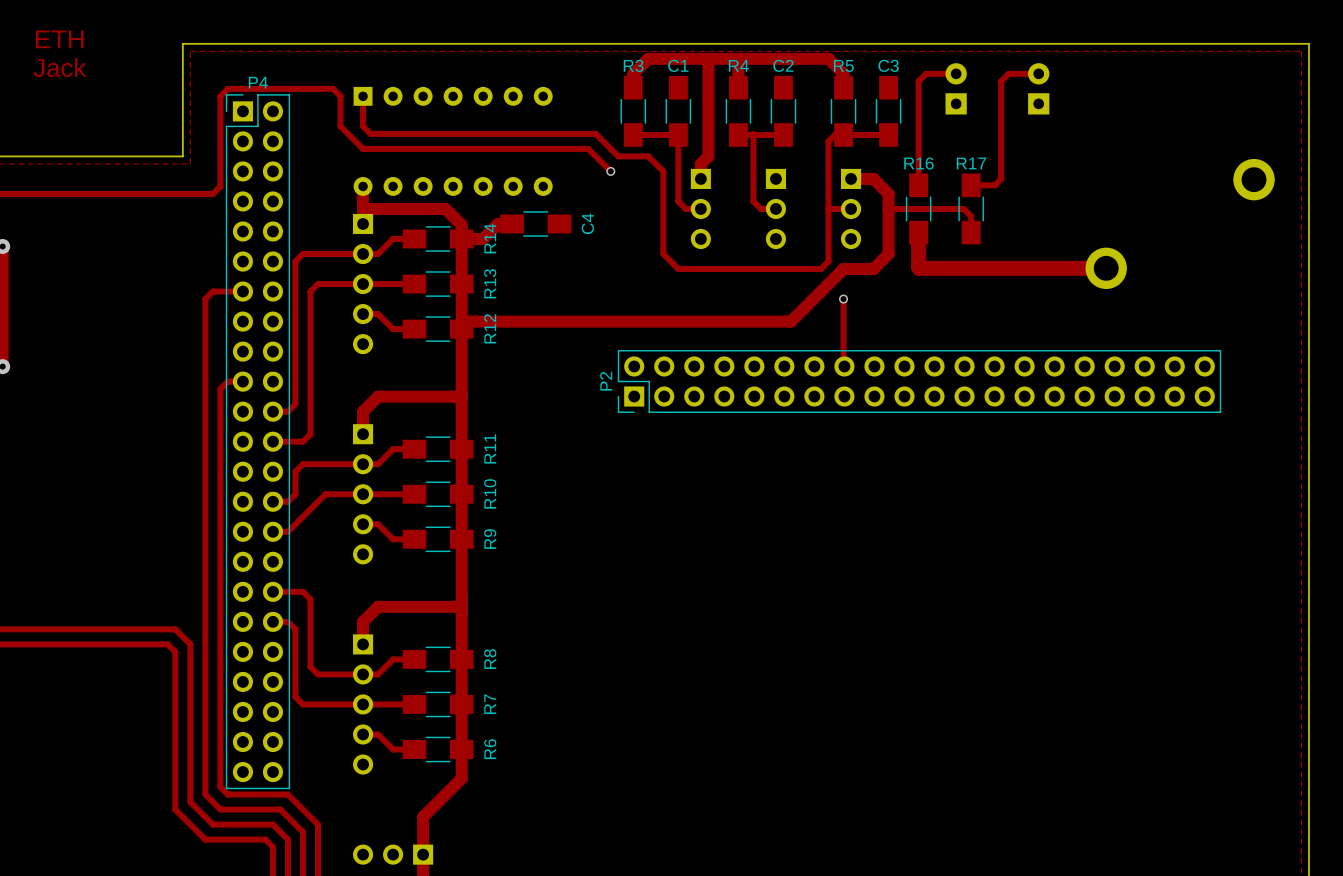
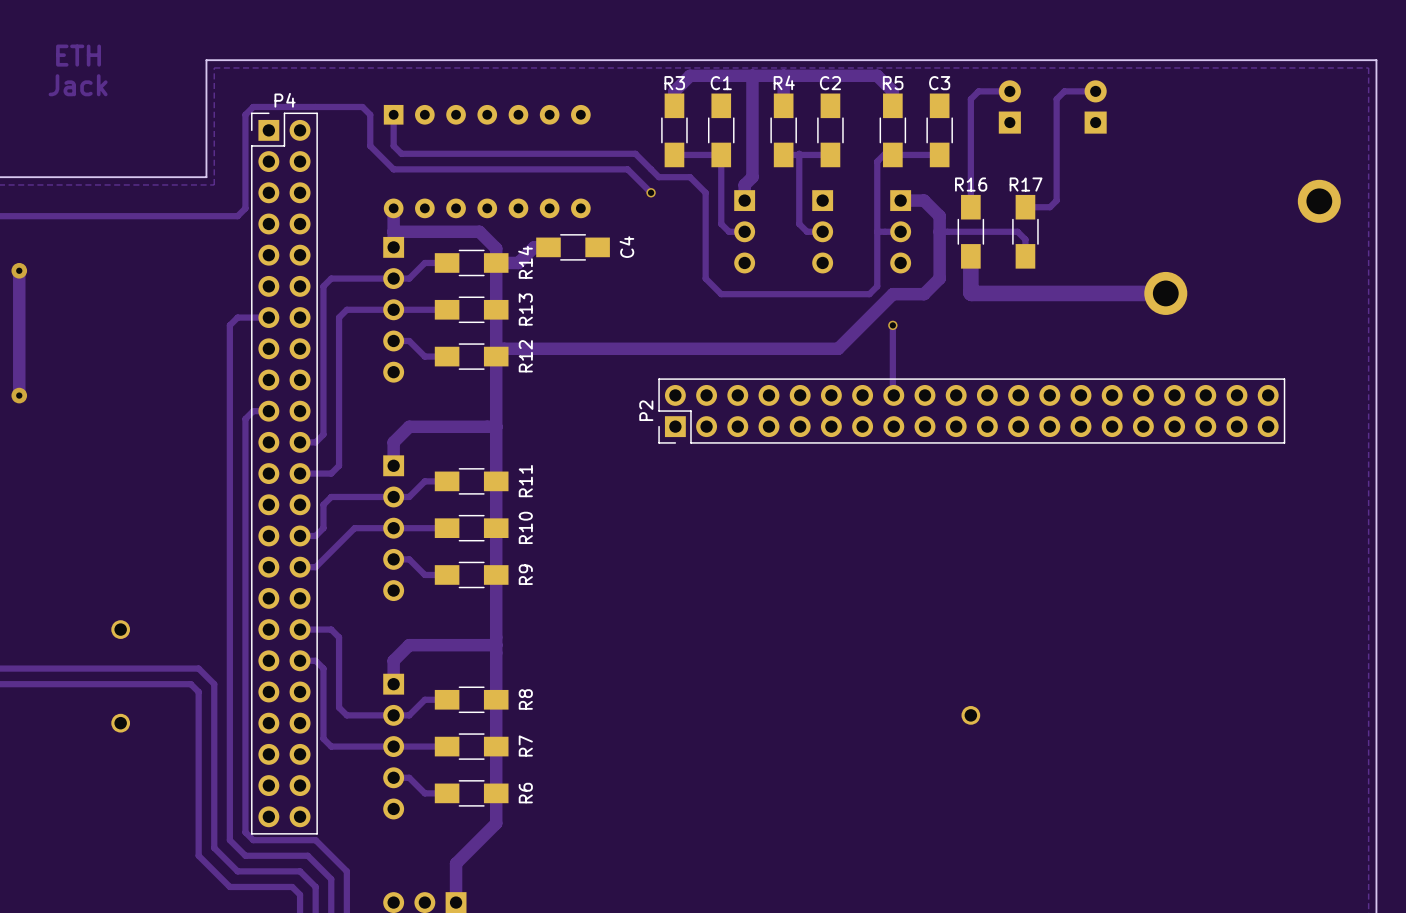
part: none -> (120, 629)
part: none -> (970, 715)
part: none -> (120, 723)

